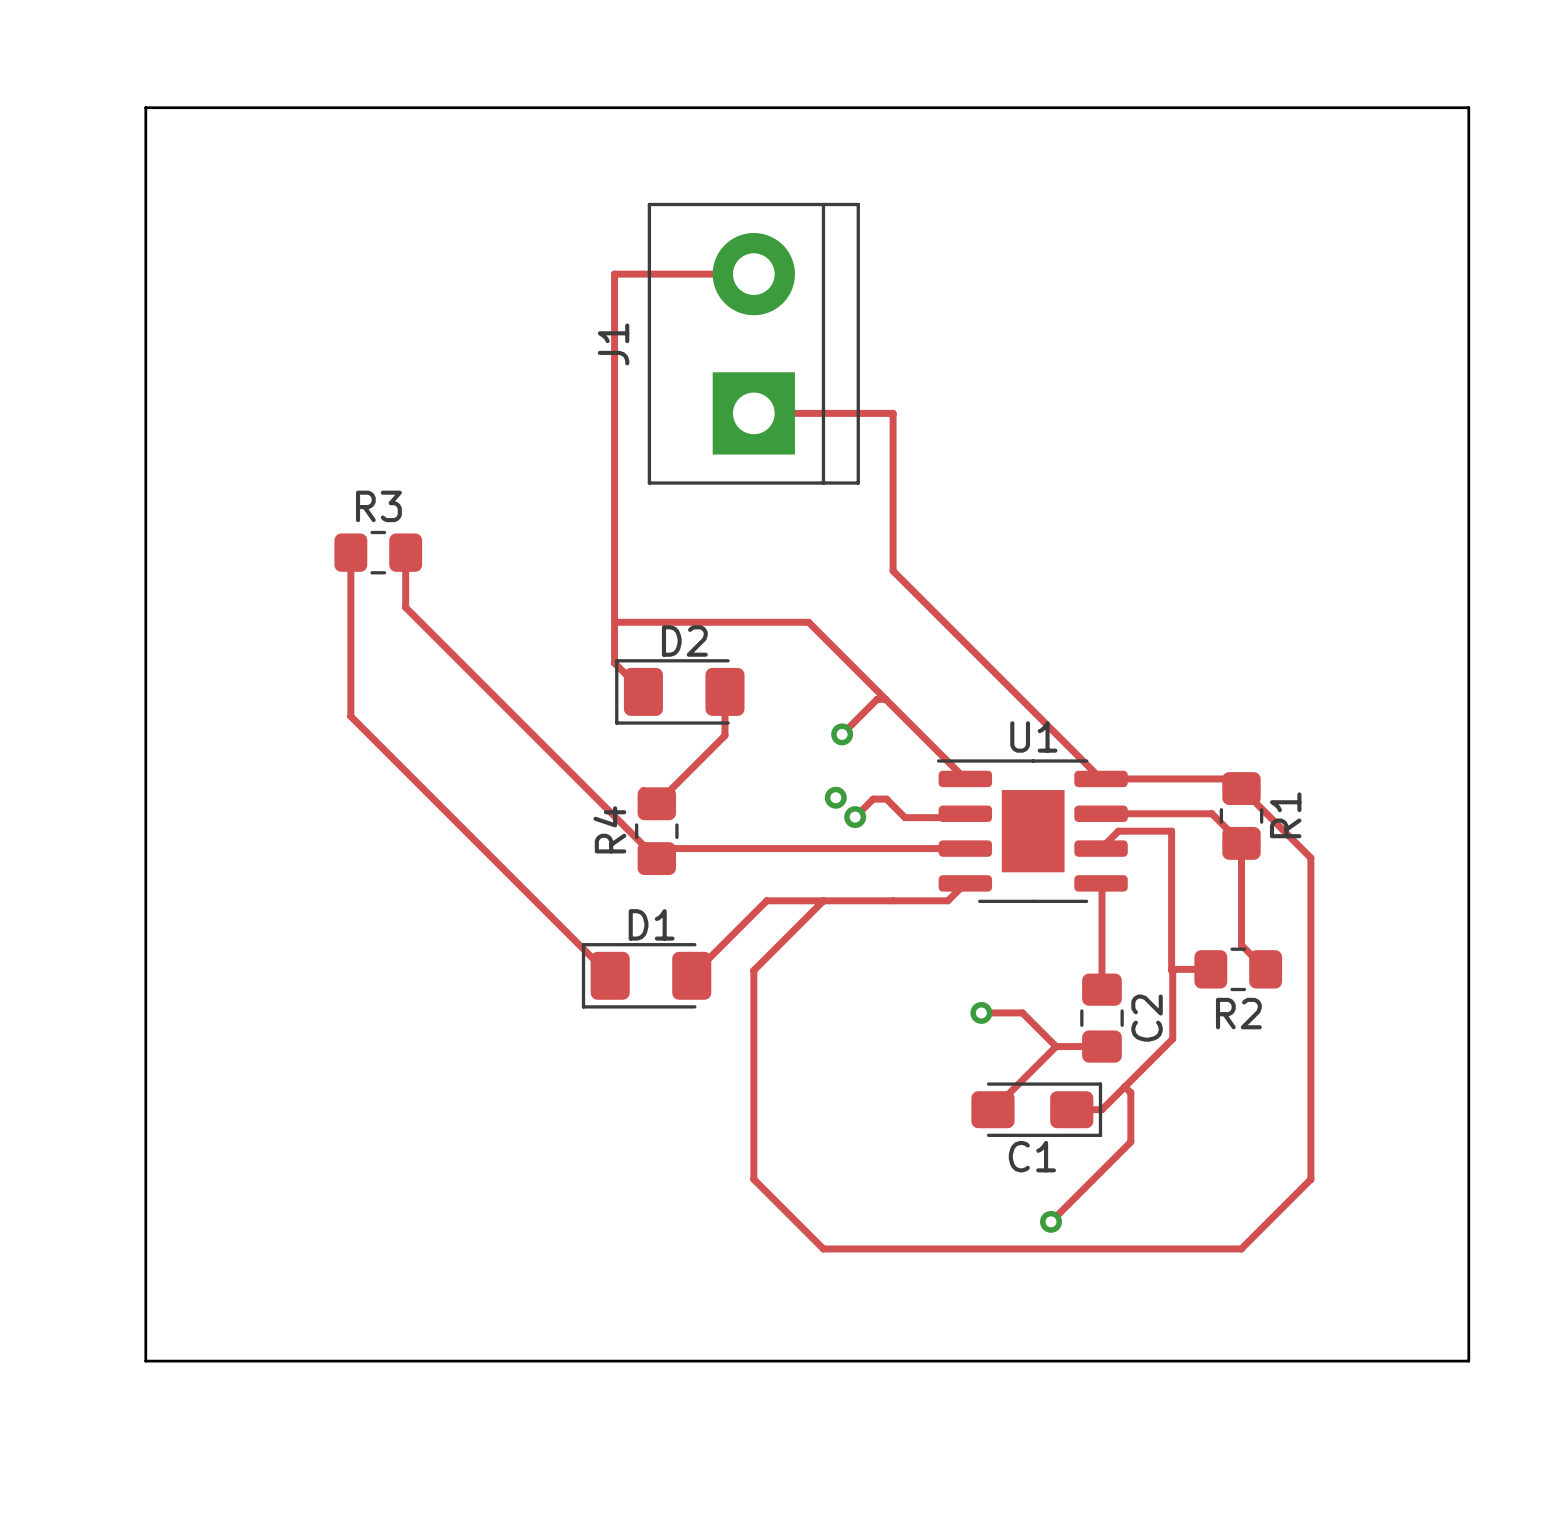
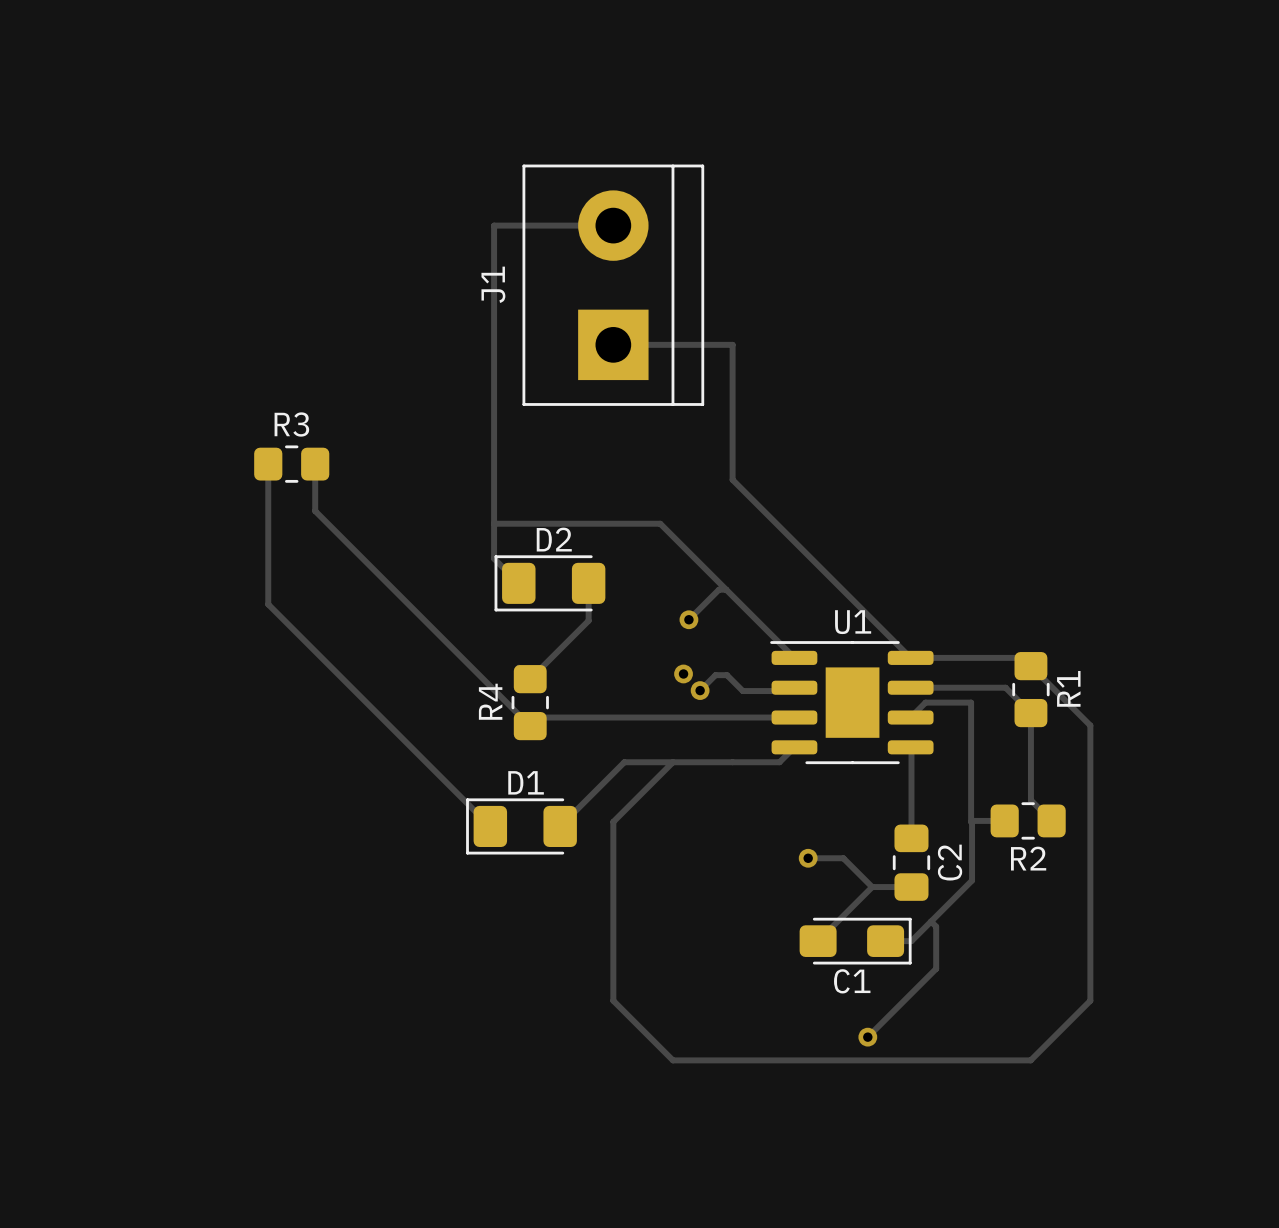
board edge: (145, 107) (1468, 107) (1468, 1361) (145, 1361) (145, 107) -> none

